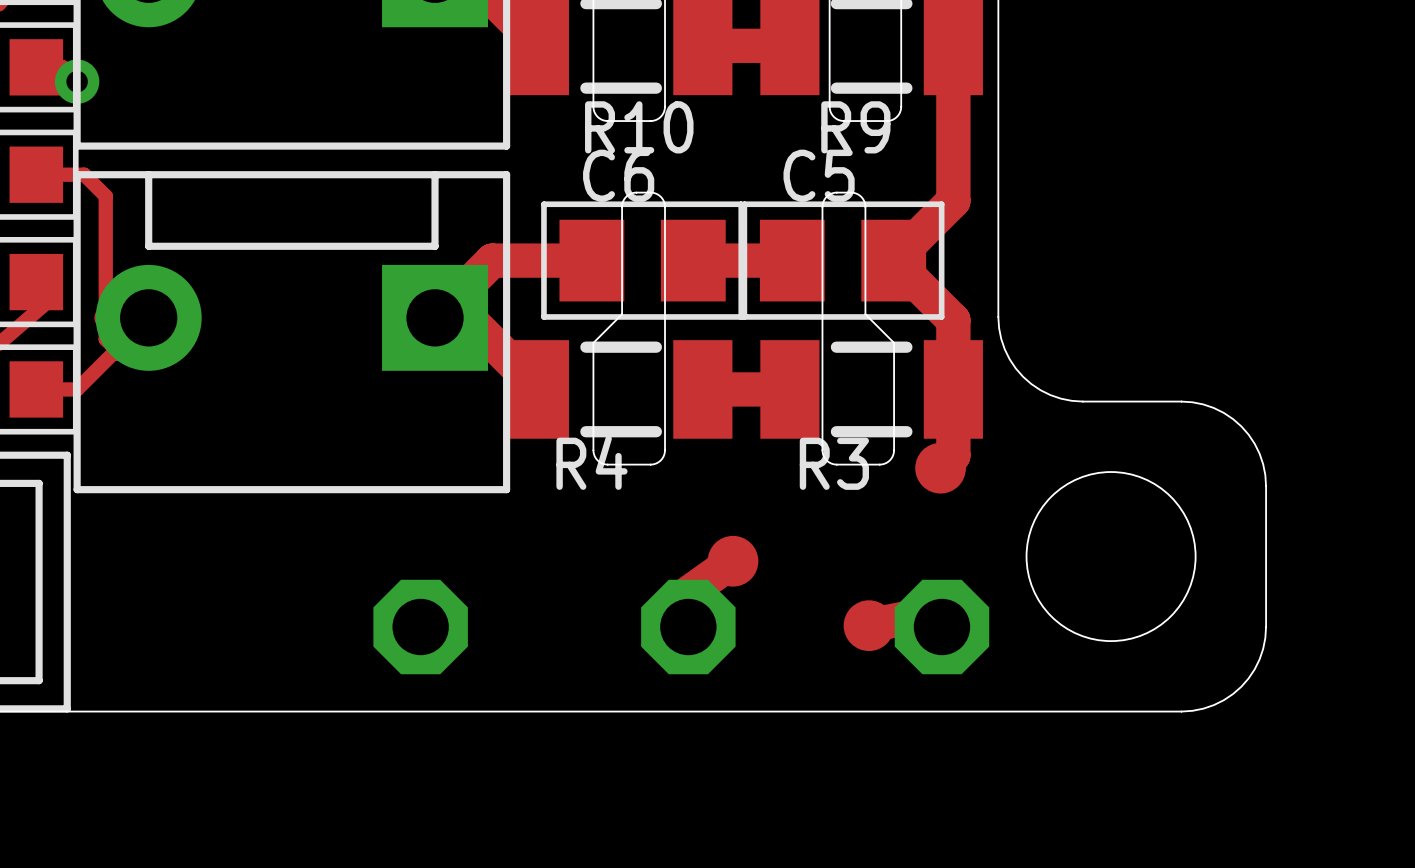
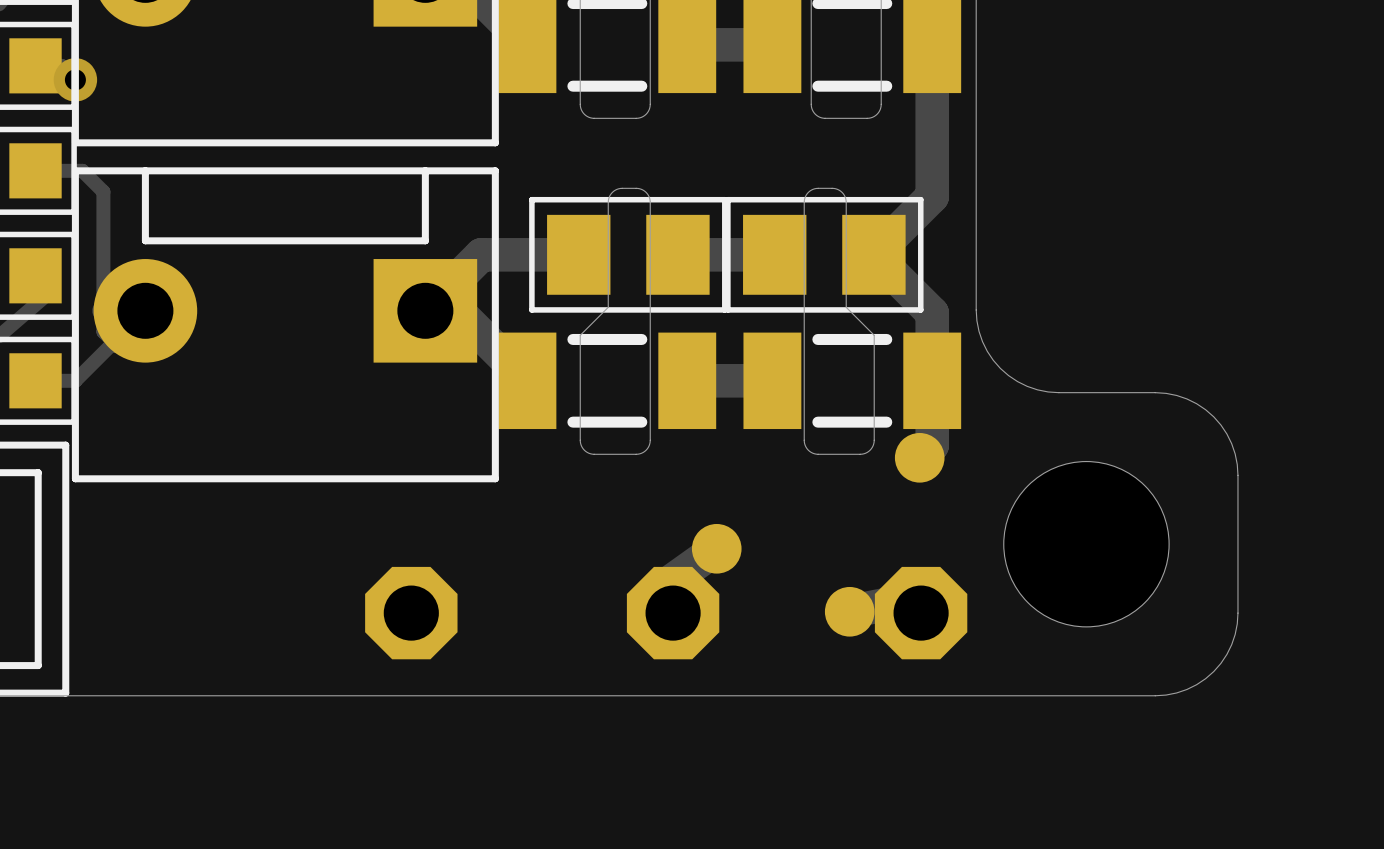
R10 name: R10 (639, 127) -> none
R9 name: R9 (855, 127) -> none
C6 name: C6 (618, 175) -> none
C5 name: C5 (819, 175) -> none
R4 name: R4 (591, 462) -> none
R3 name: R3 (834, 463) -> none

